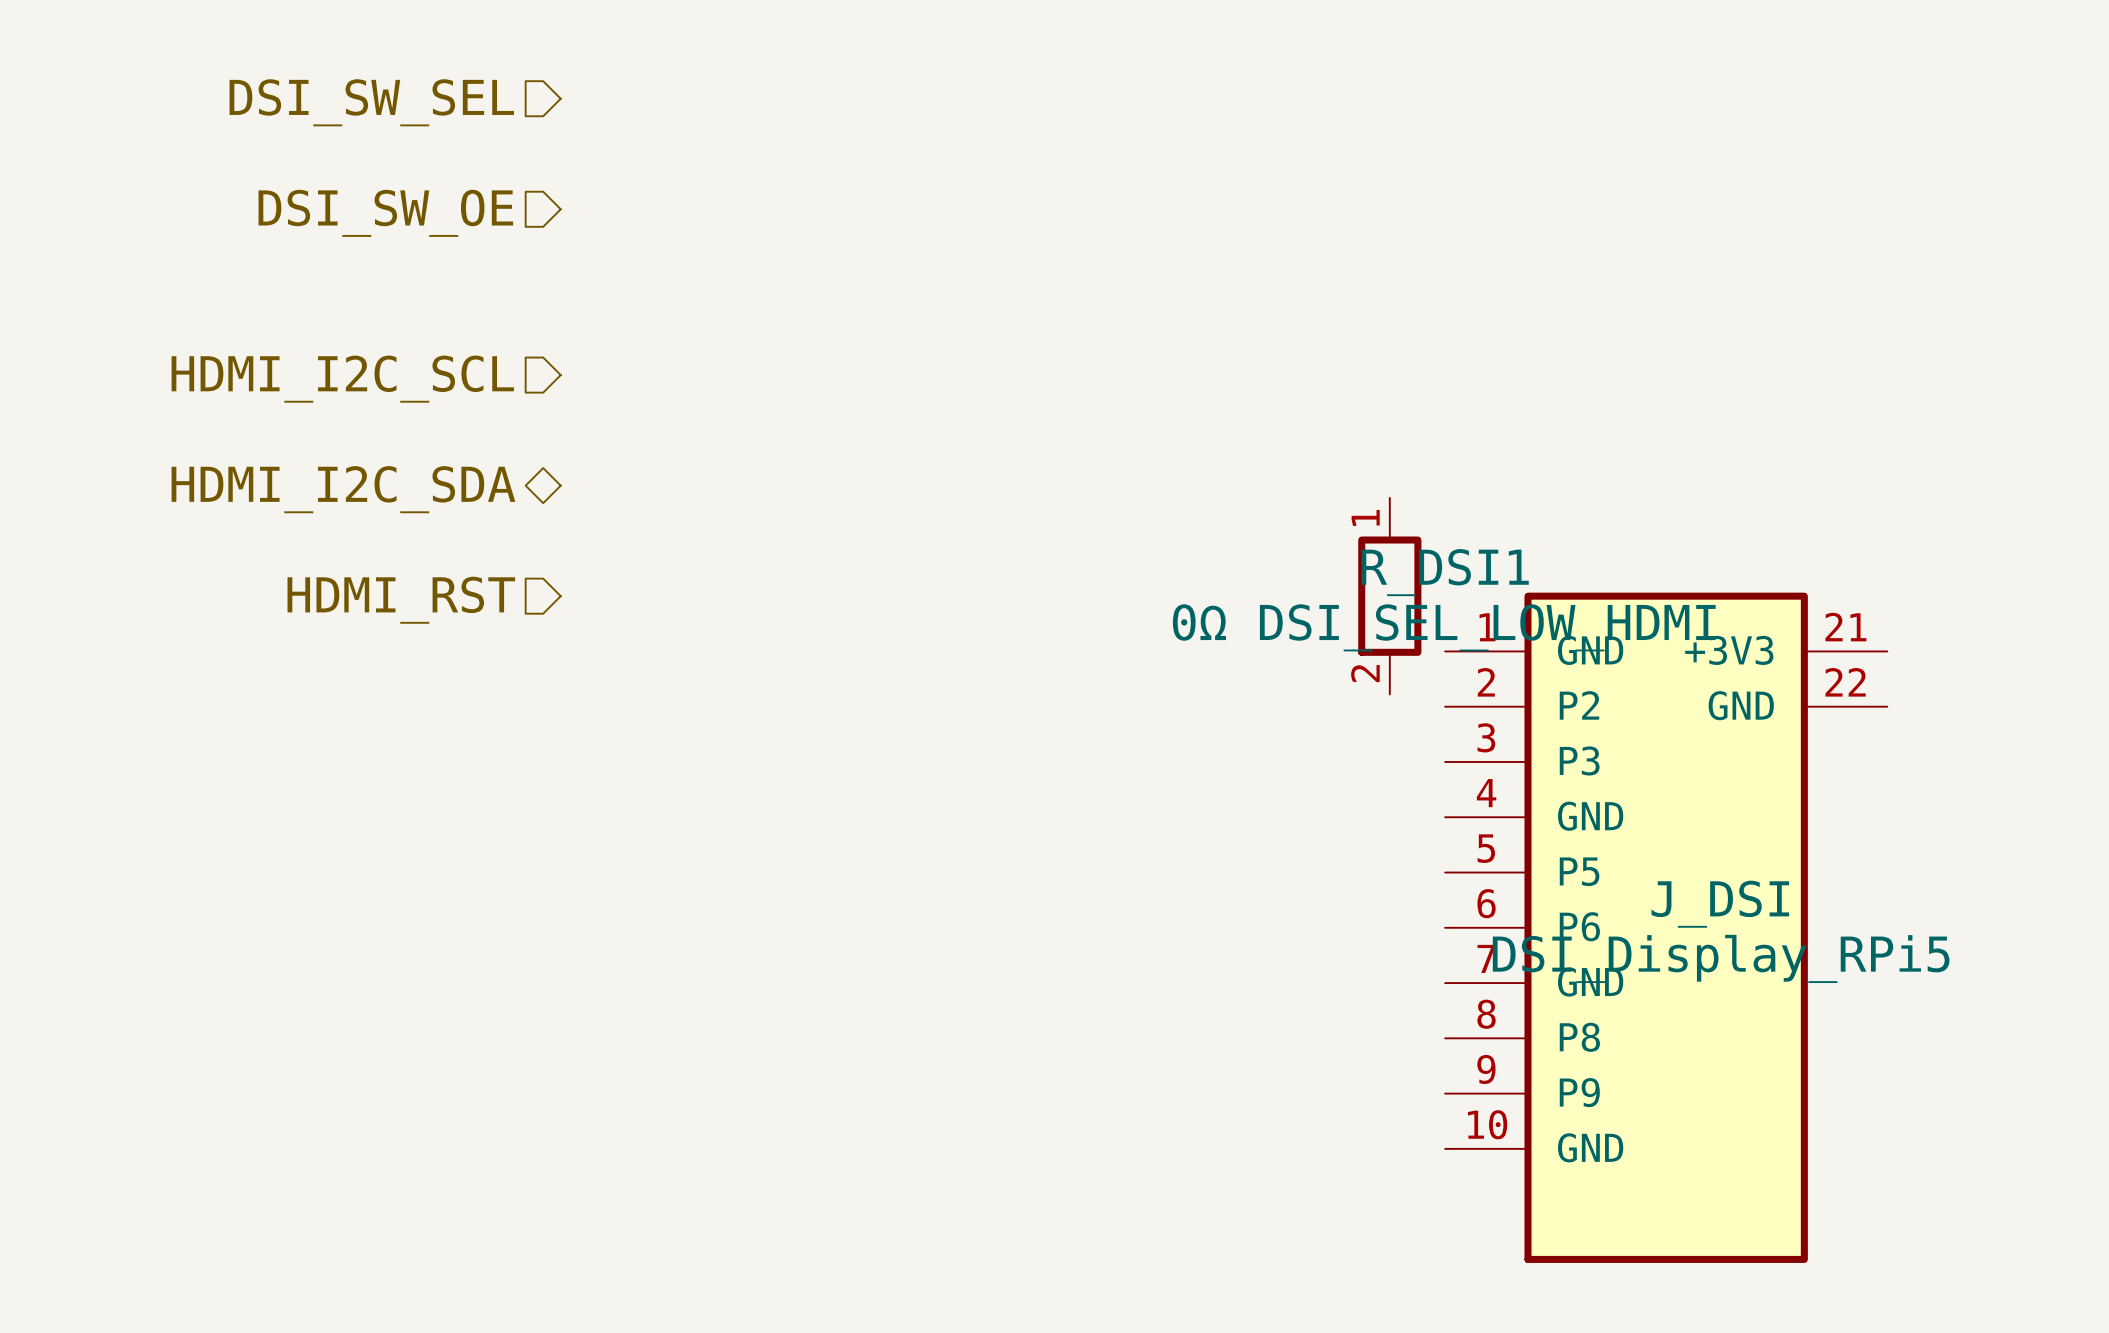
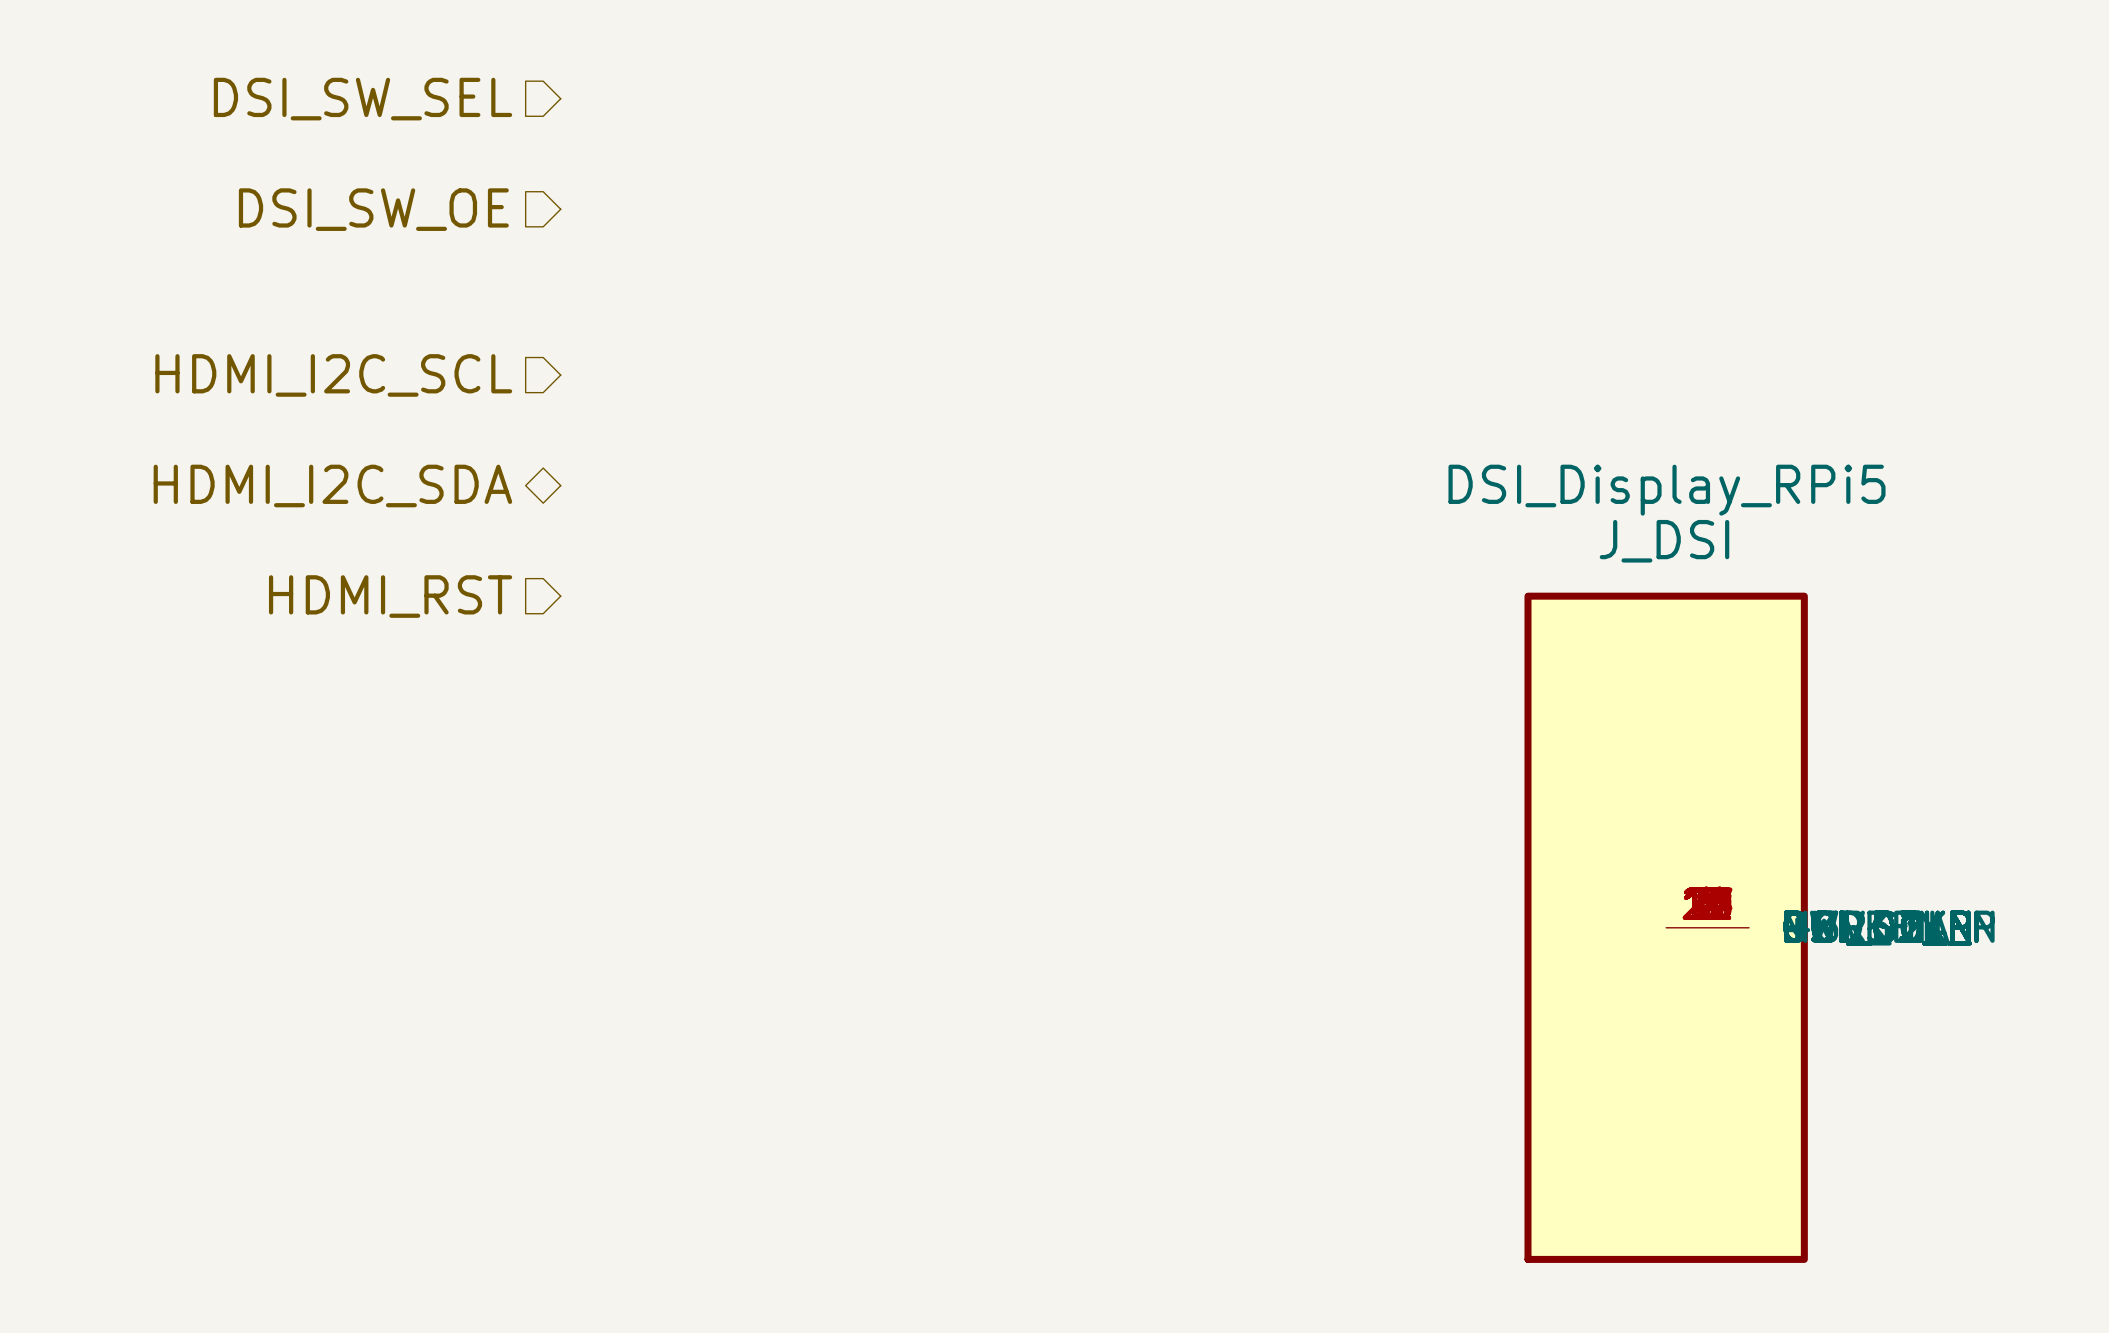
J_DSI symbol: [1445, 592, 1888, 1263] -> [1524, 592, 1808, 1263]
R_DSI1: 0Ω DSI_SEL_LOW_HDMI (1389, 596) -> none
J_DSI name position: J_DSI (1720, 904) -> J_DSI (1664, 541)
J_DSI value position: DSI_Display_RPi5 (1721, 958) -> DSI_Display_RPi5 (1667, 490)

